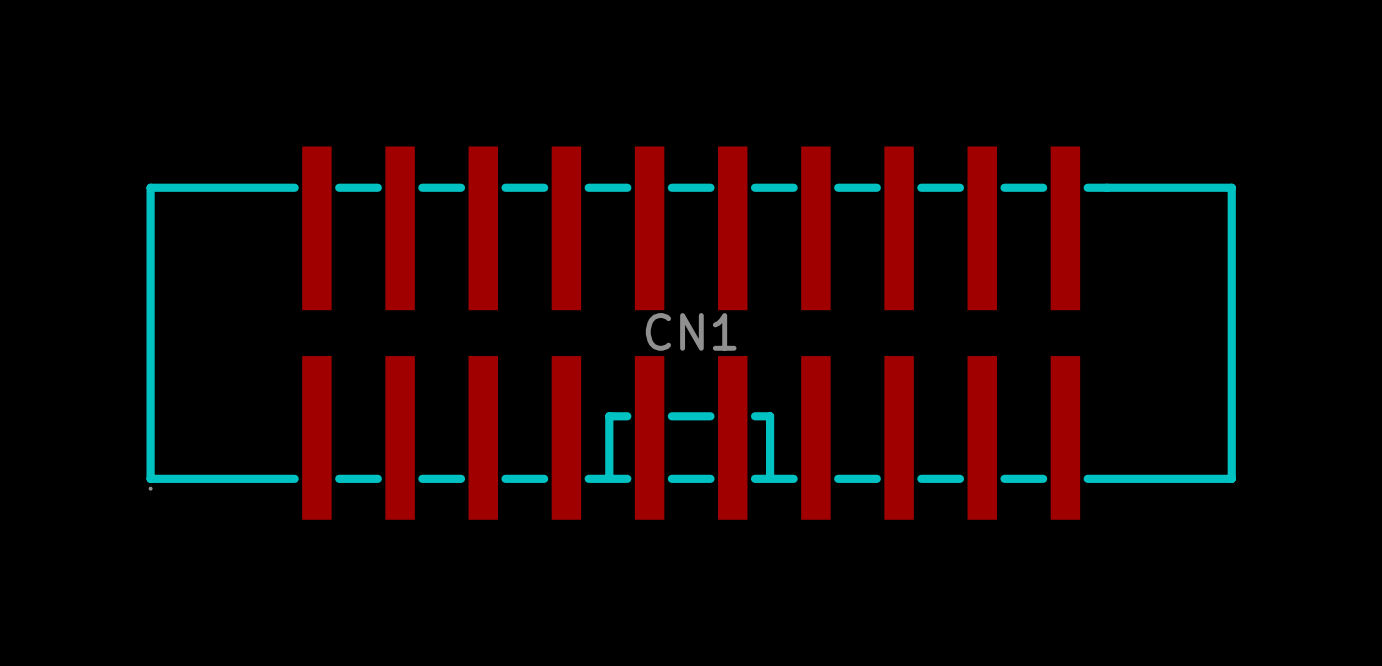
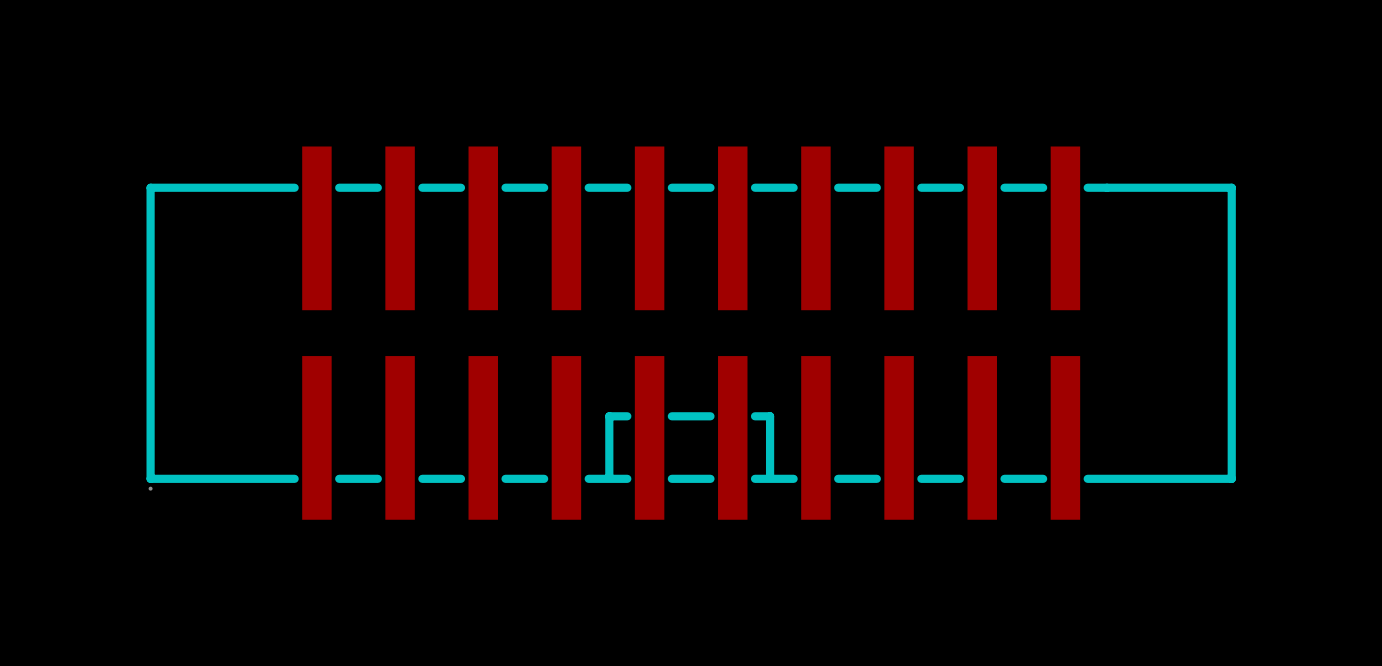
CN1 name: CN1 (691, 331) -> none

